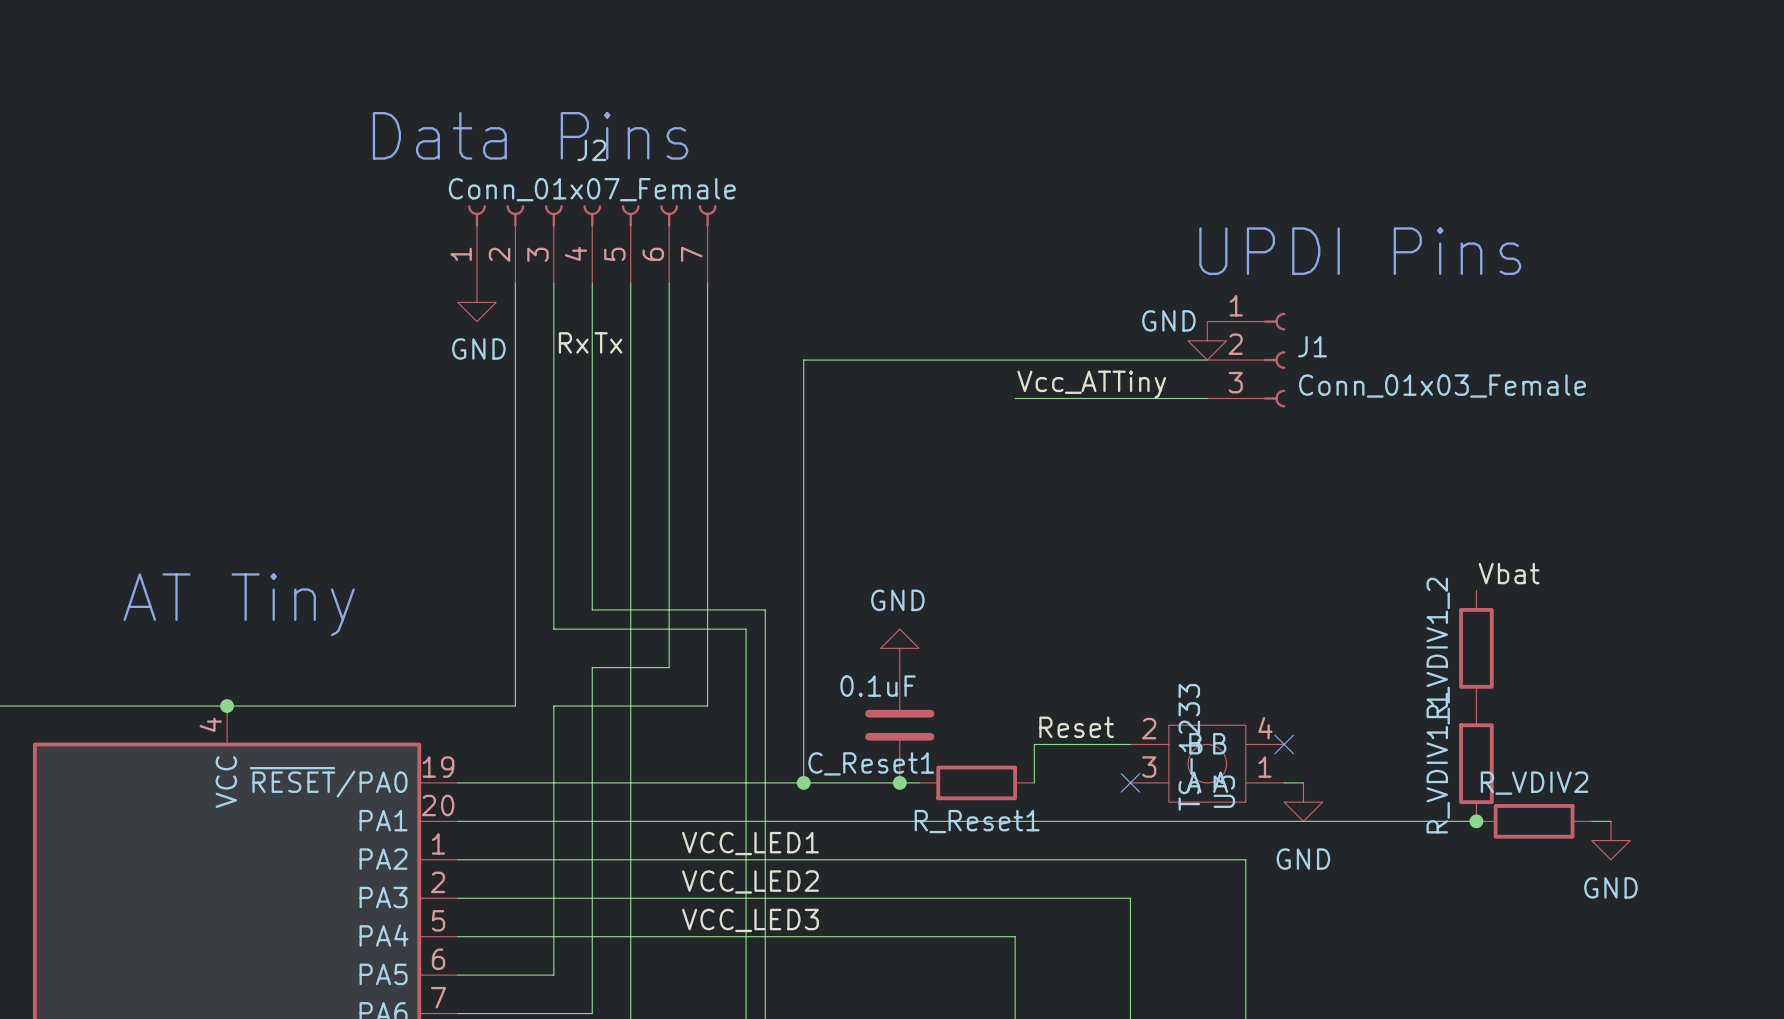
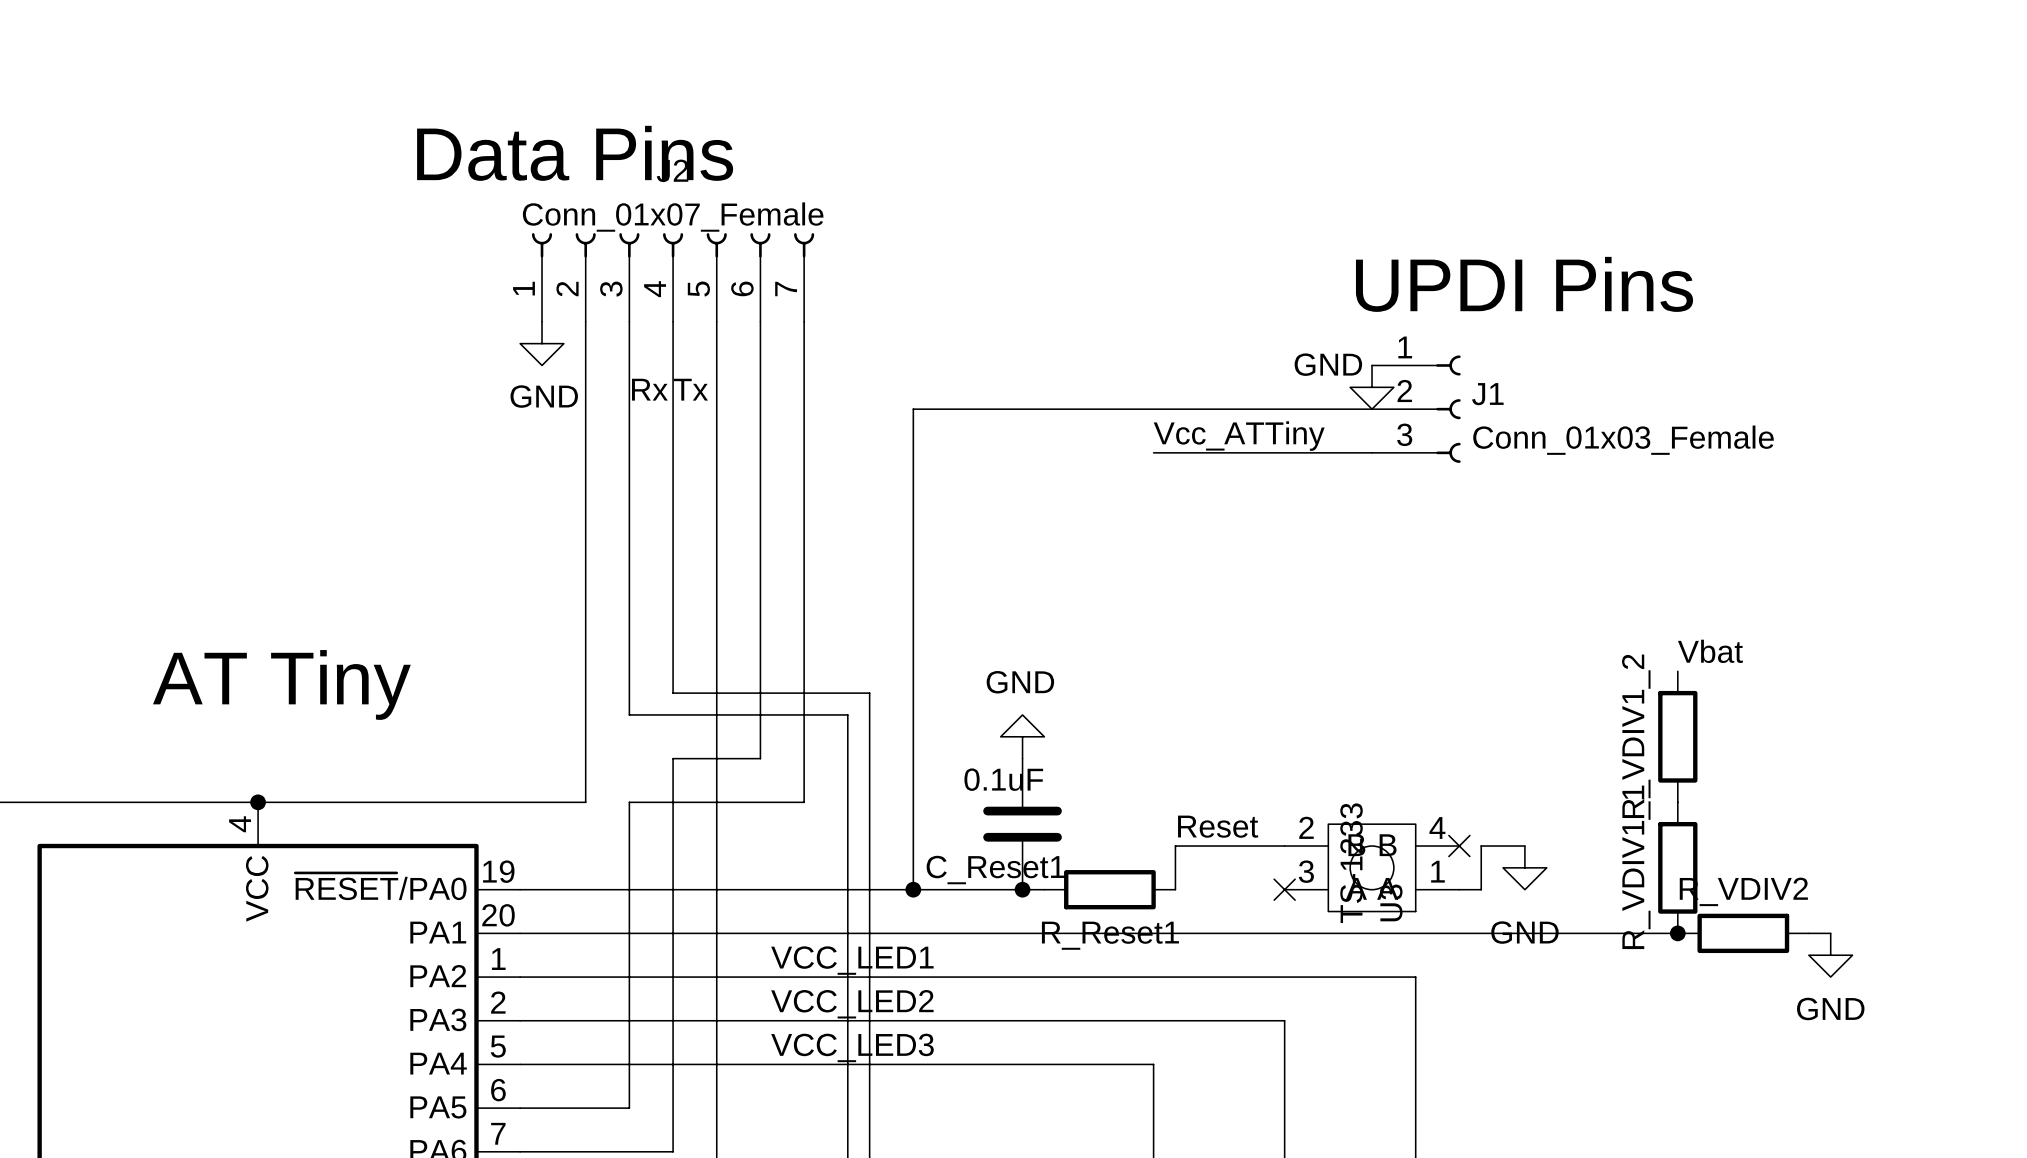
wire: none -> (1524, 846) (1481, 846) (1481, 889)
power symbol position: GND (1303, 802) -> GND (1524, 867)

